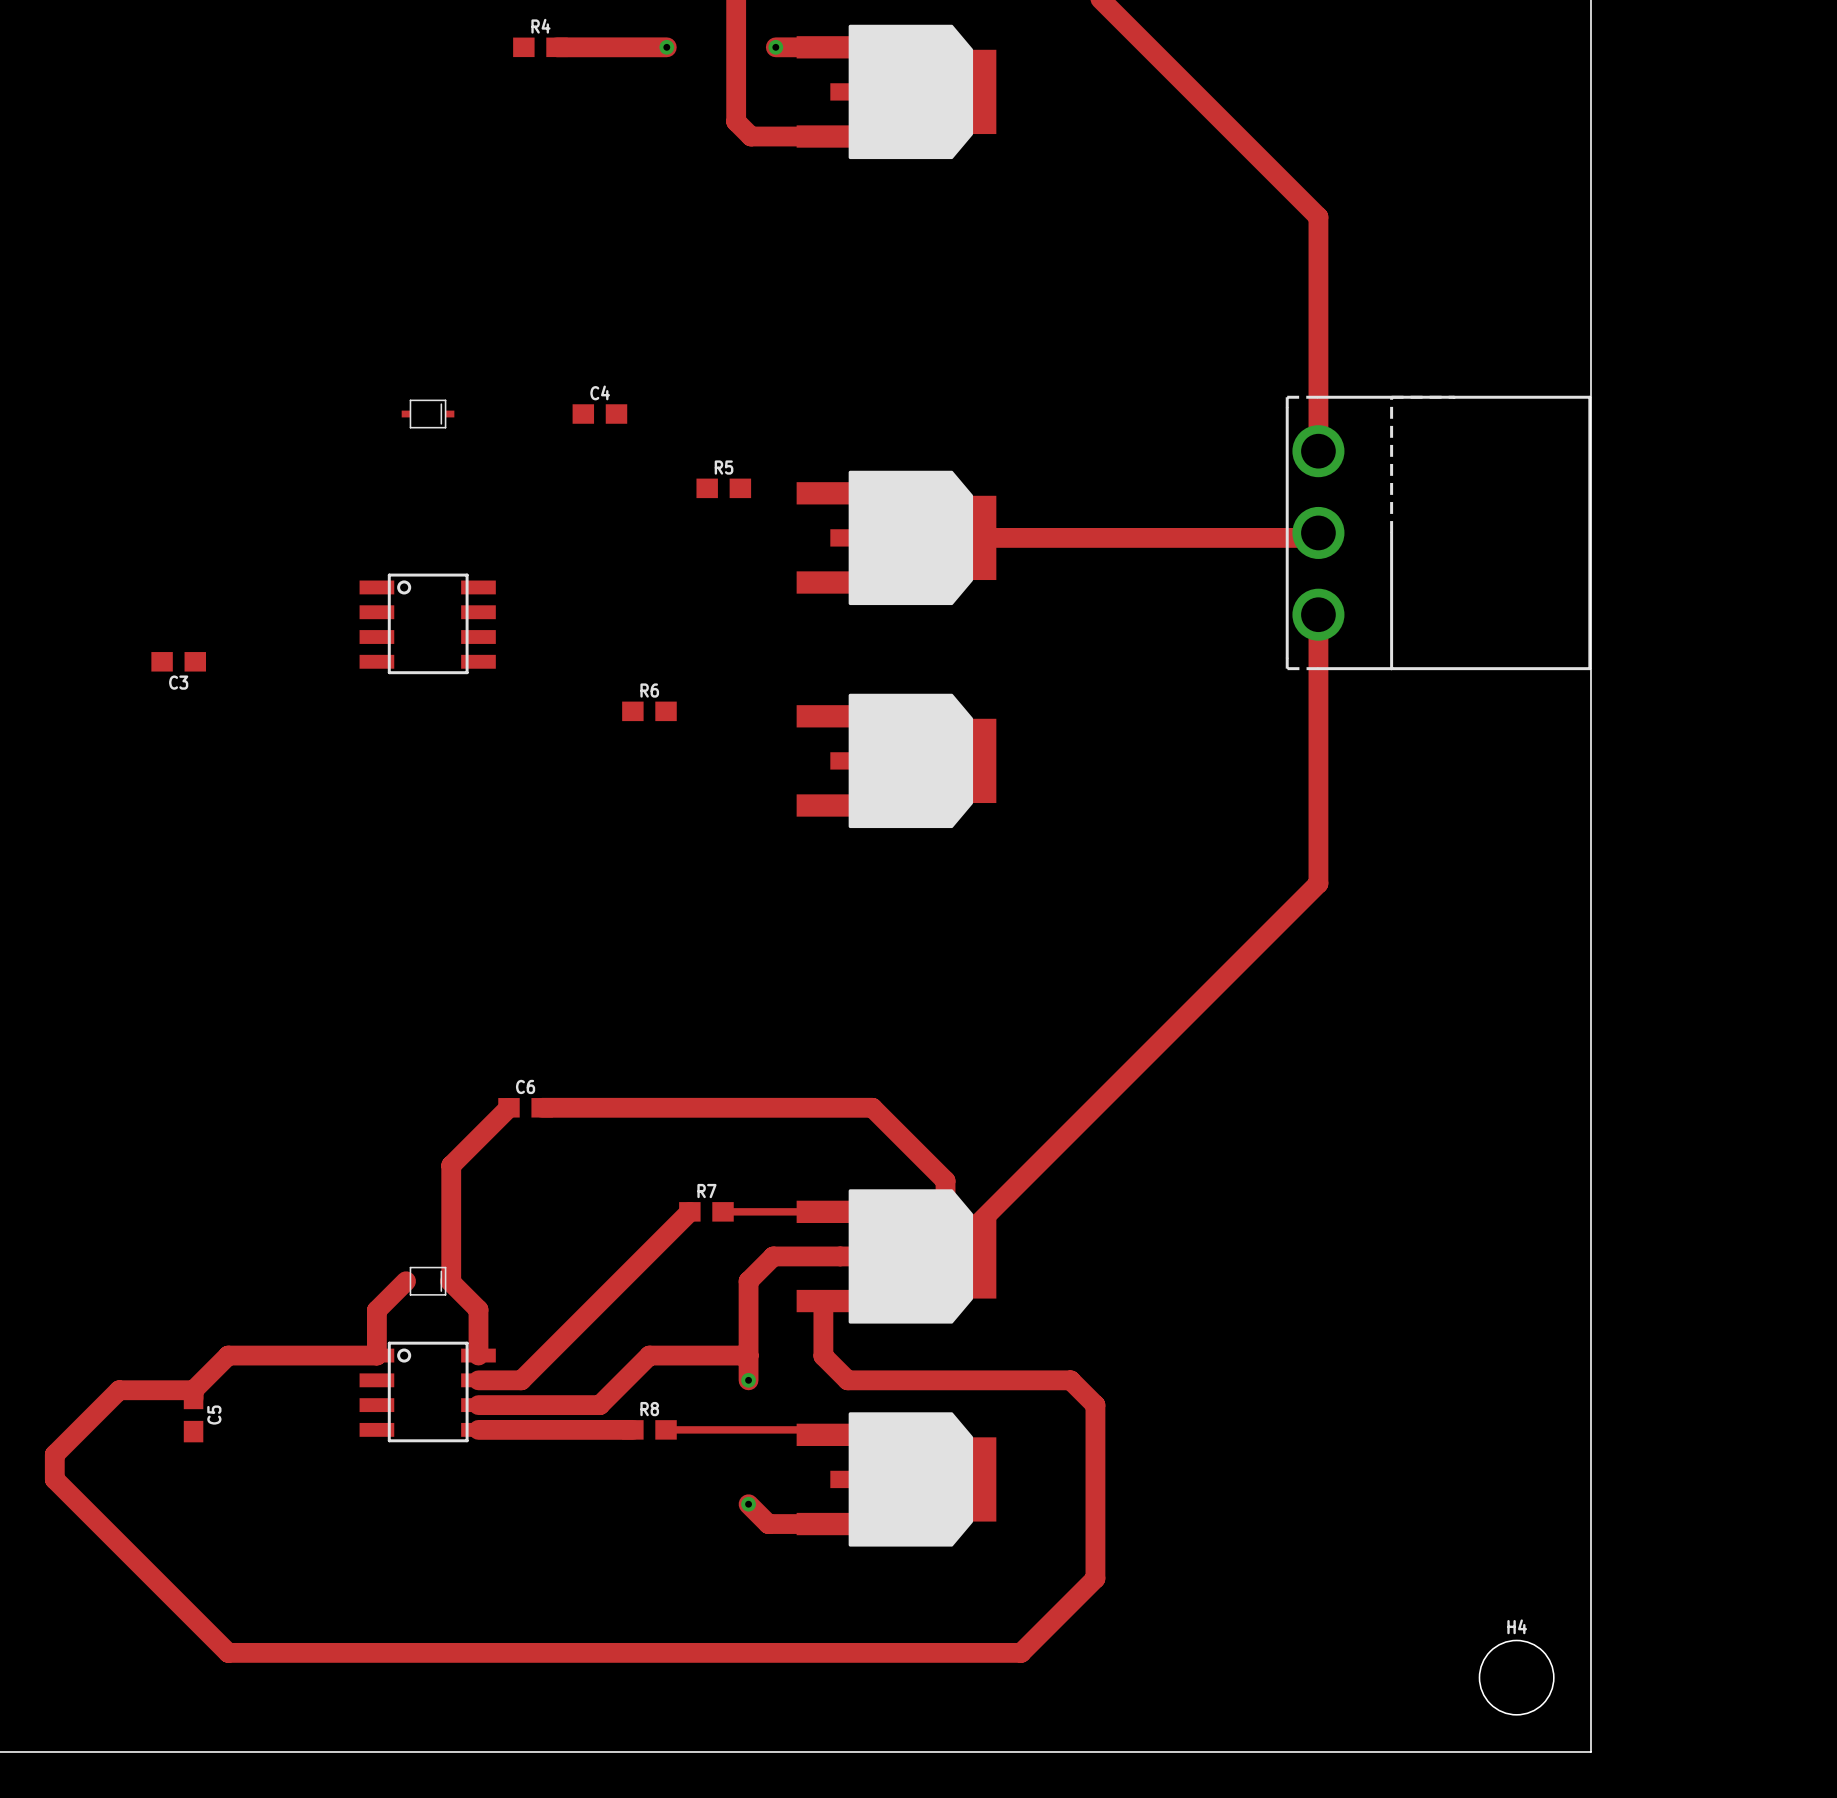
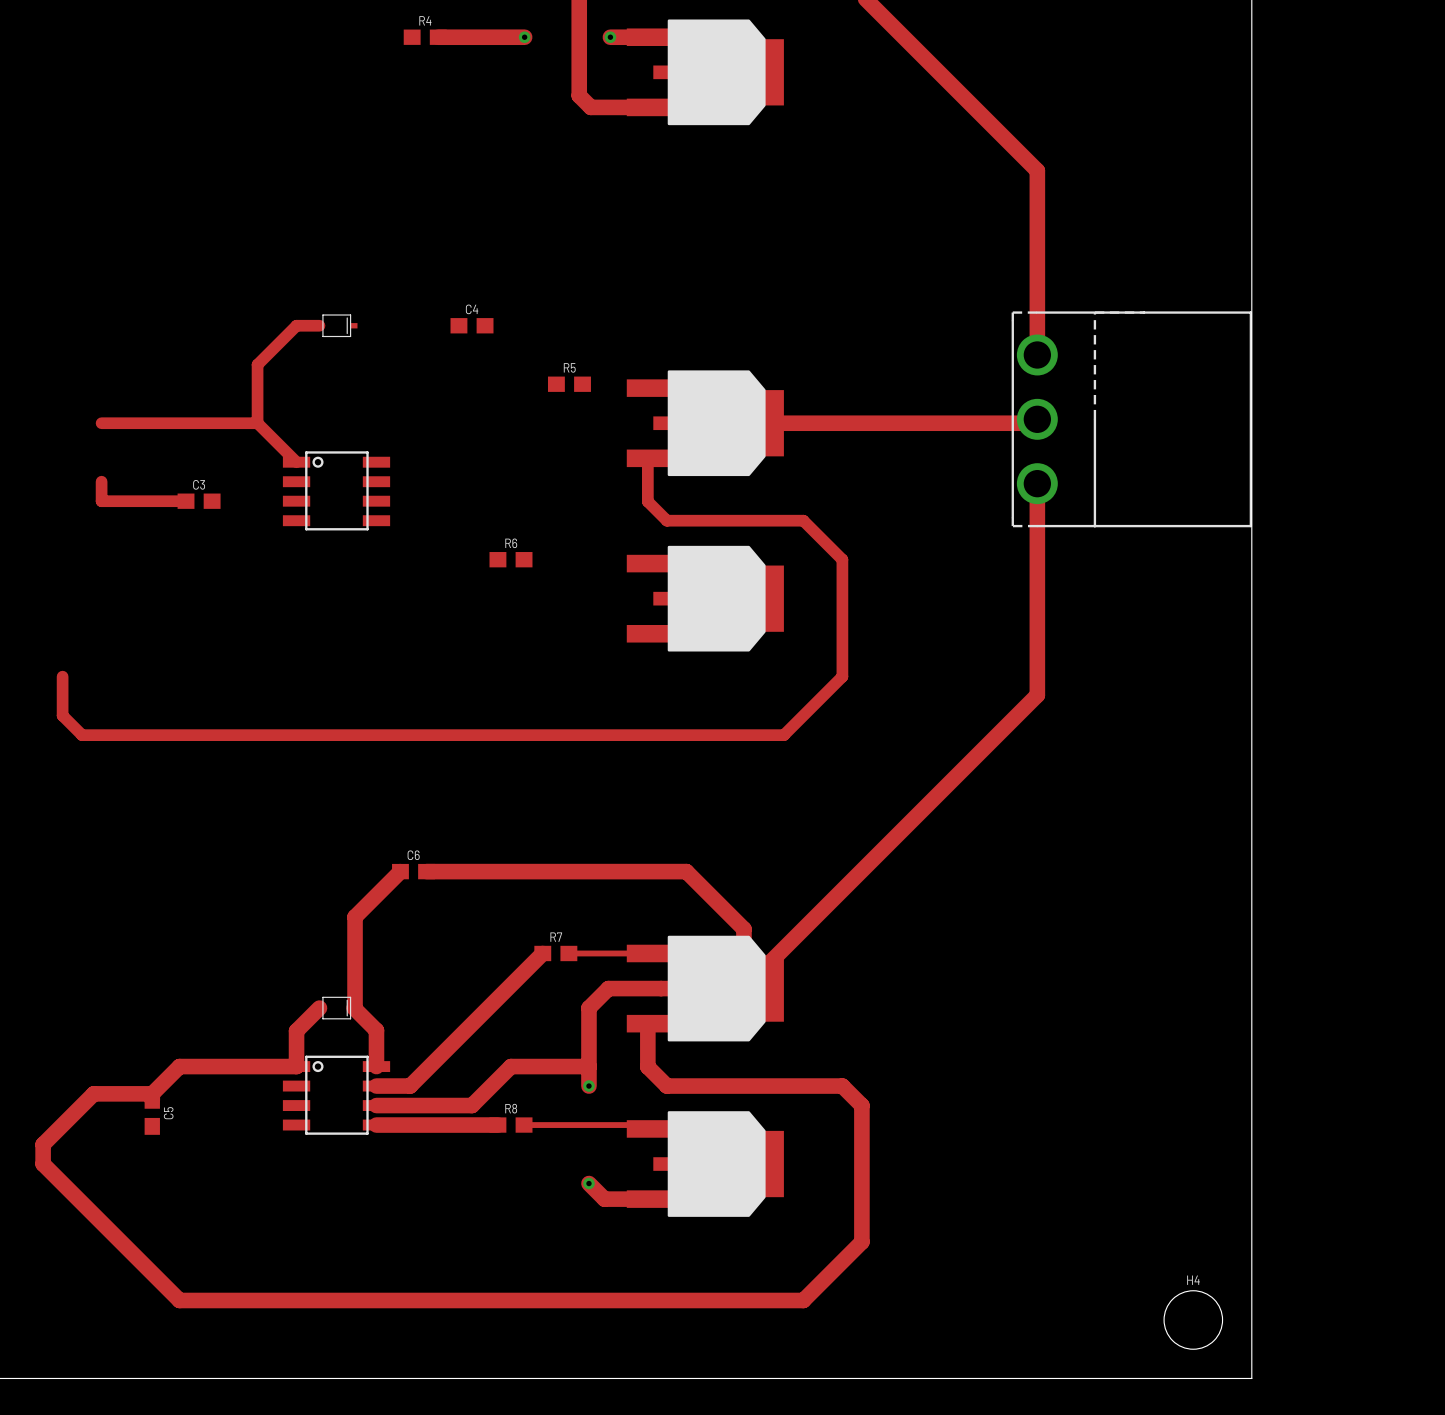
track: none -> (319, 325) (296, 325) (257, 364) (257, 423)
track: none -> (101, 423) (257, 423)
track: none -> (257, 423) (296, 462)
track: none -> (647, 458) (647, 501) (666, 520) (803, 520) (842, 559) (842, 676) (783, 735) (82, 735) (62, 715) (62, 676)
track: none -> (101, 481) (101, 501) (186, 501)
C3 position: (178, 661) -> (199, 501)
C3 name position: C3 (178, 682) -> C3 (199, 484)

